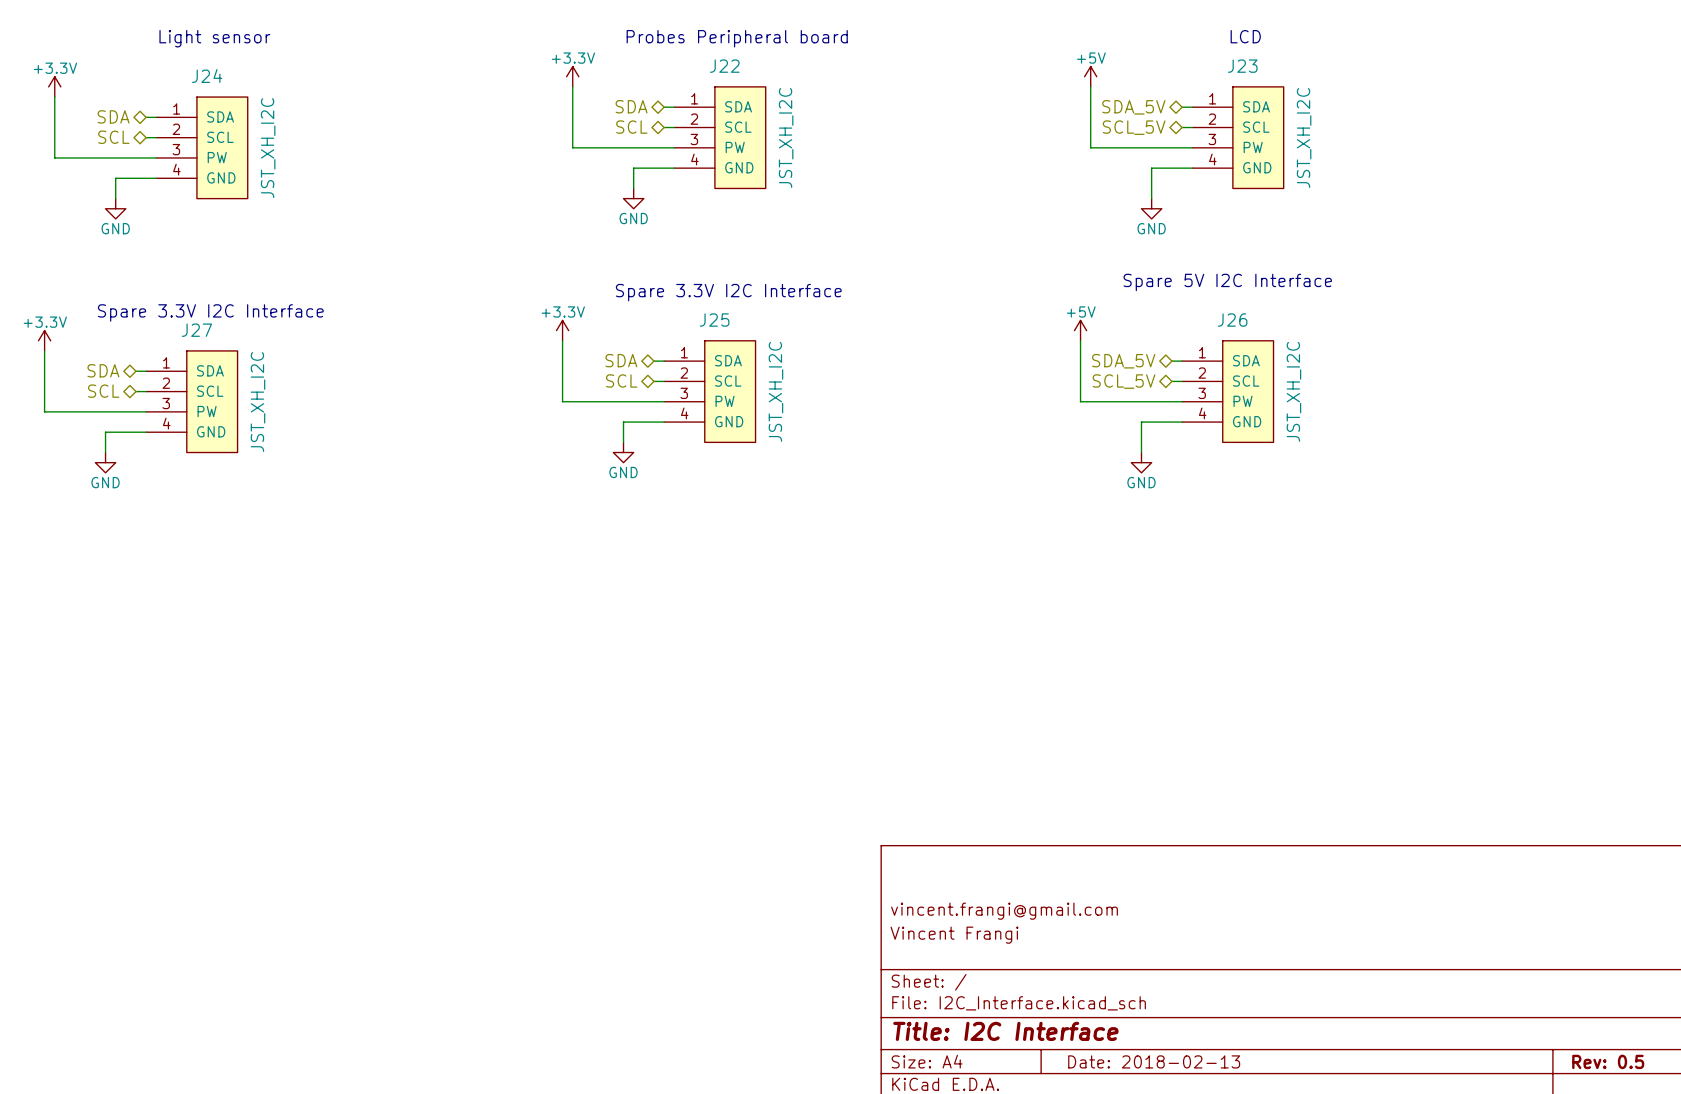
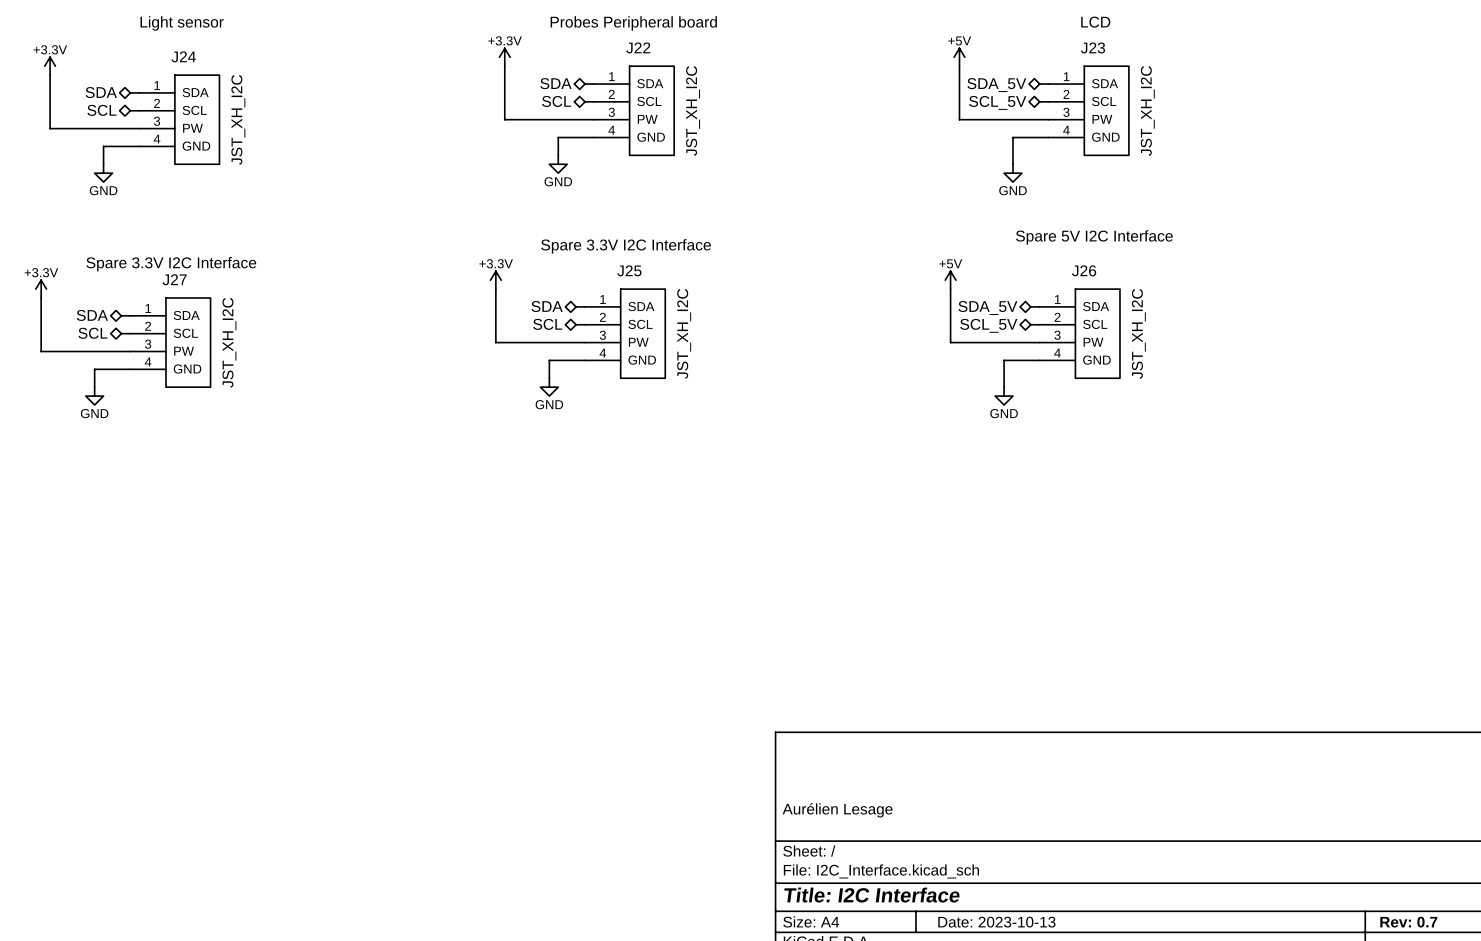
title block: vincent.frangi@gmail.com (1004, 911) -> none
title block: Vincent Frangi (954, 935) -> Aurélien Lesage (837, 810)
title block: Date: 2018-02-13 (1154, 1061) -> Date: 2023-10-13 (996, 922)
title block: Rev: 0.5 (1608, 1061) -> Rev: 0.7 (1408, 922)

